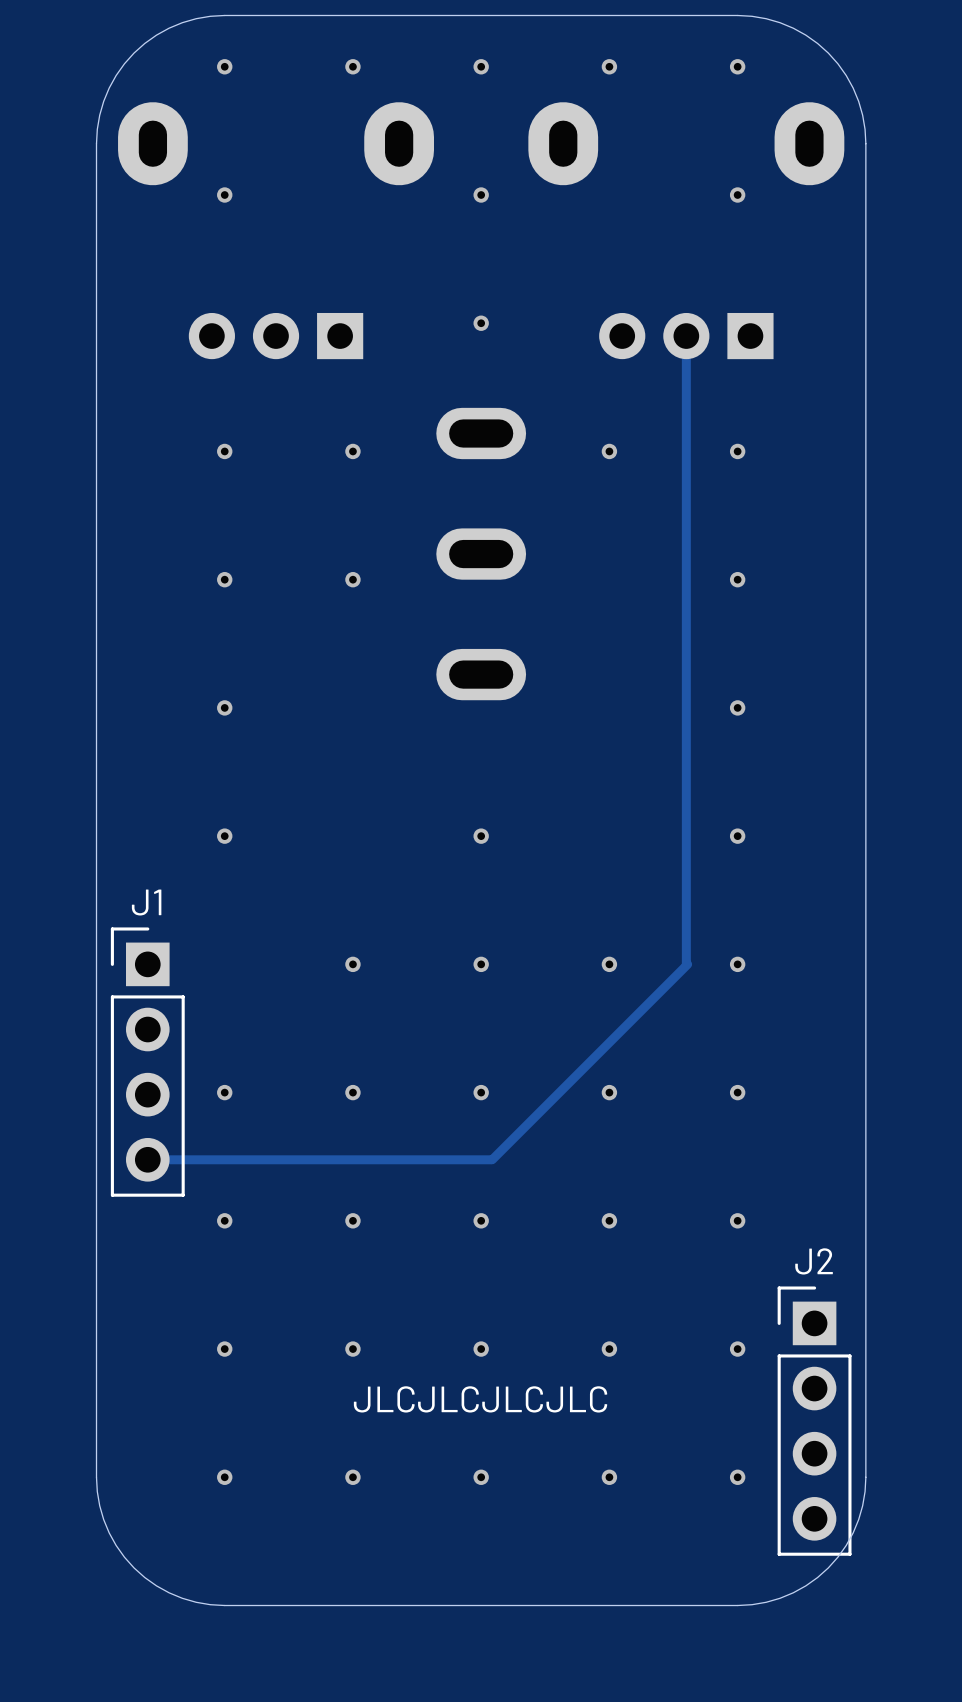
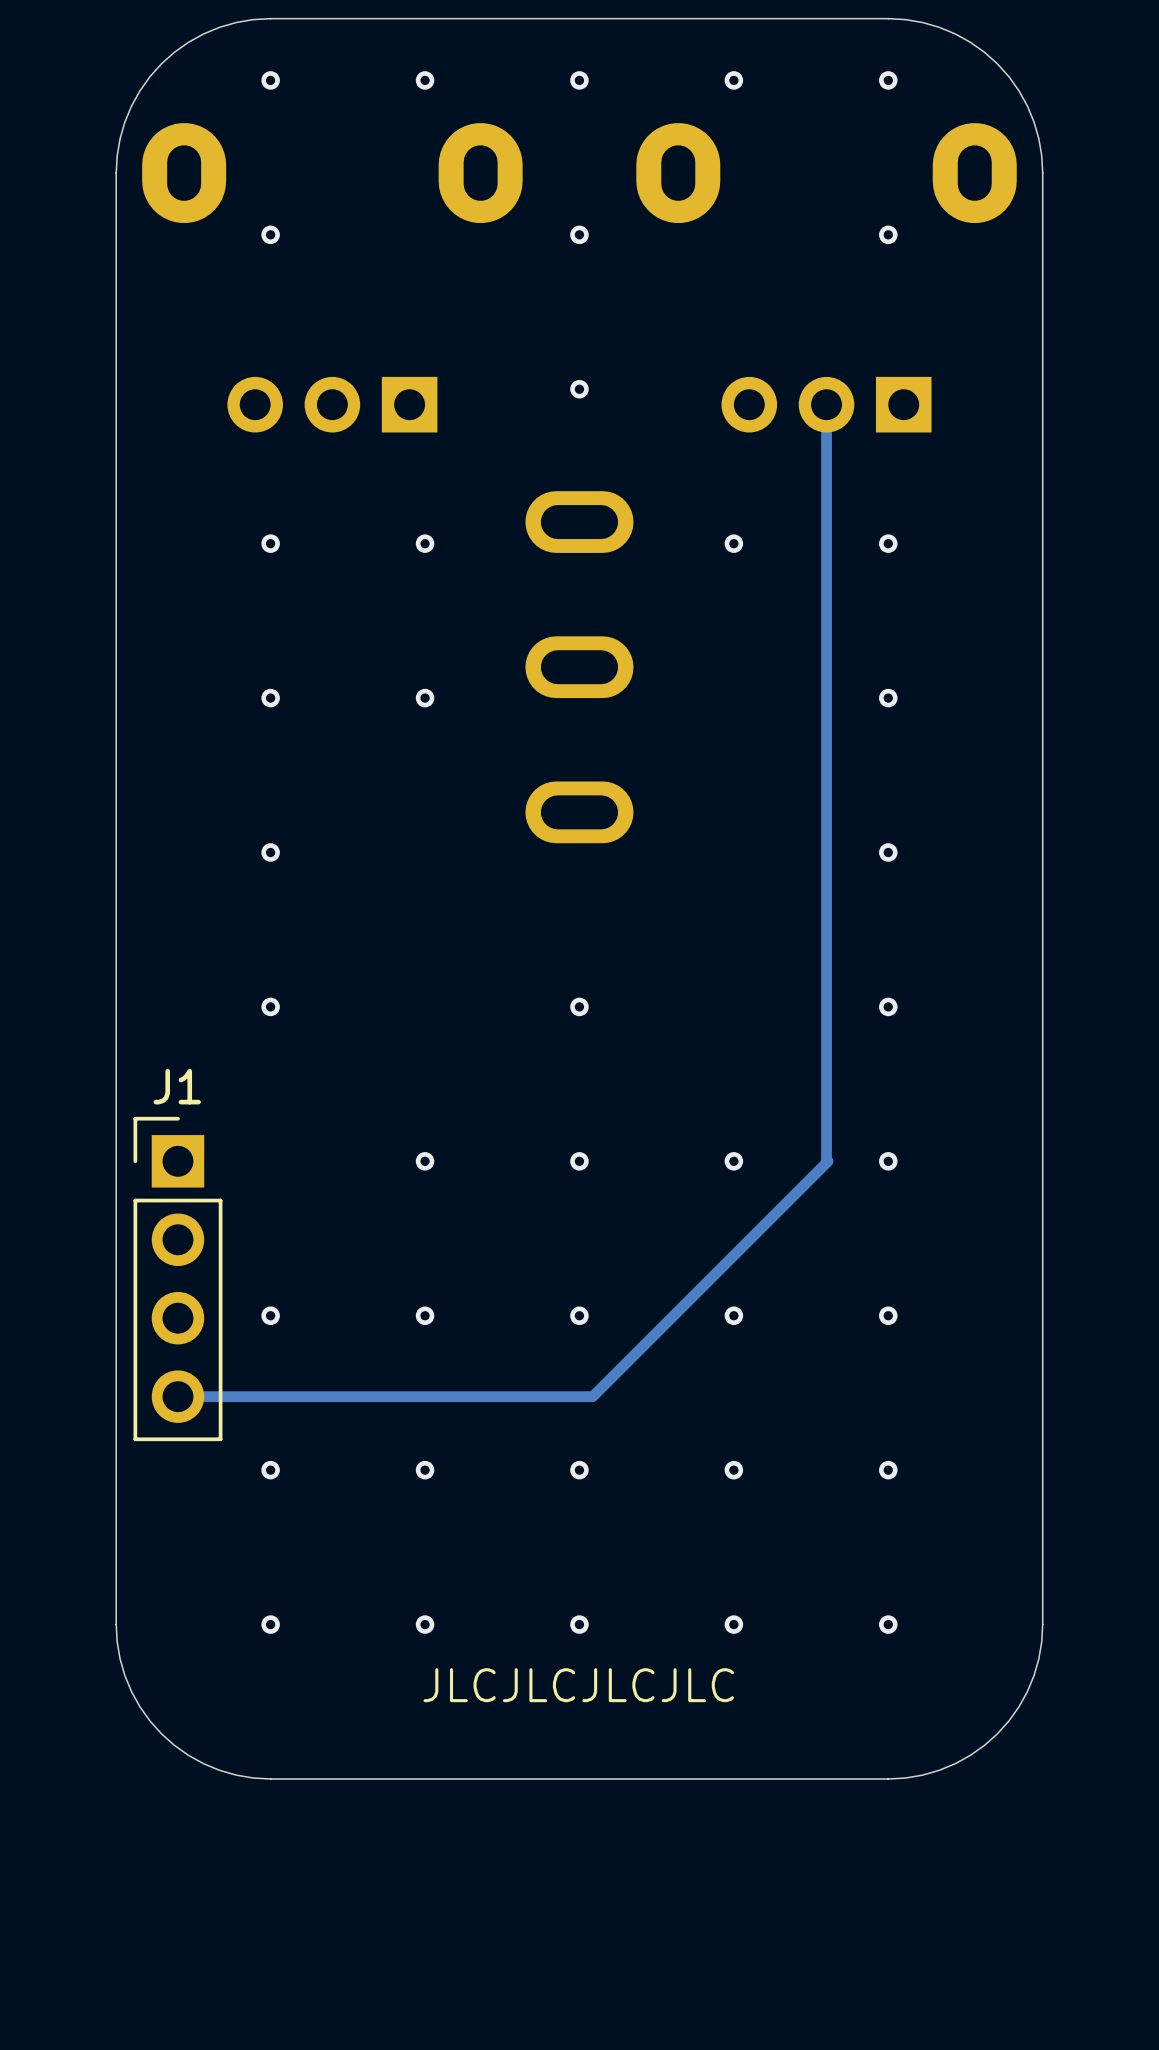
board edge: (865, 1349) (865, 1491) (858, 1519) (853, 1532) (846, 1545) (828, 1567) (805, 1585) (793, 1592) (766, 1602) (737, 1605) (224, 1605) (196, 1602) (182, 1598) (156, 1585) (134, 1567) (116, 1545) (103, 1519) (97, 1491) (96, 1477) (96, 1349) -> (1042, 1624) (1038, 1658) (1027, 1691) (1019, 1706) (997, 1733) (970, 1755) (939, 1770) (922, 1775) (888, 1778) (270, 1778) (236, 1775) (219, 1770) (188, 1755) (174, 1745) (149, 1720) (139, 1706) (124, 1675) (117, 1641) (116, 1624)
J2: (814, 1421) -> none
via: (224, 1477) -> none
via: (352, 1477) -> none
via: (481, 1477) -> none
via: (609, 1477) -> none
via: (737, 1477) -> none

